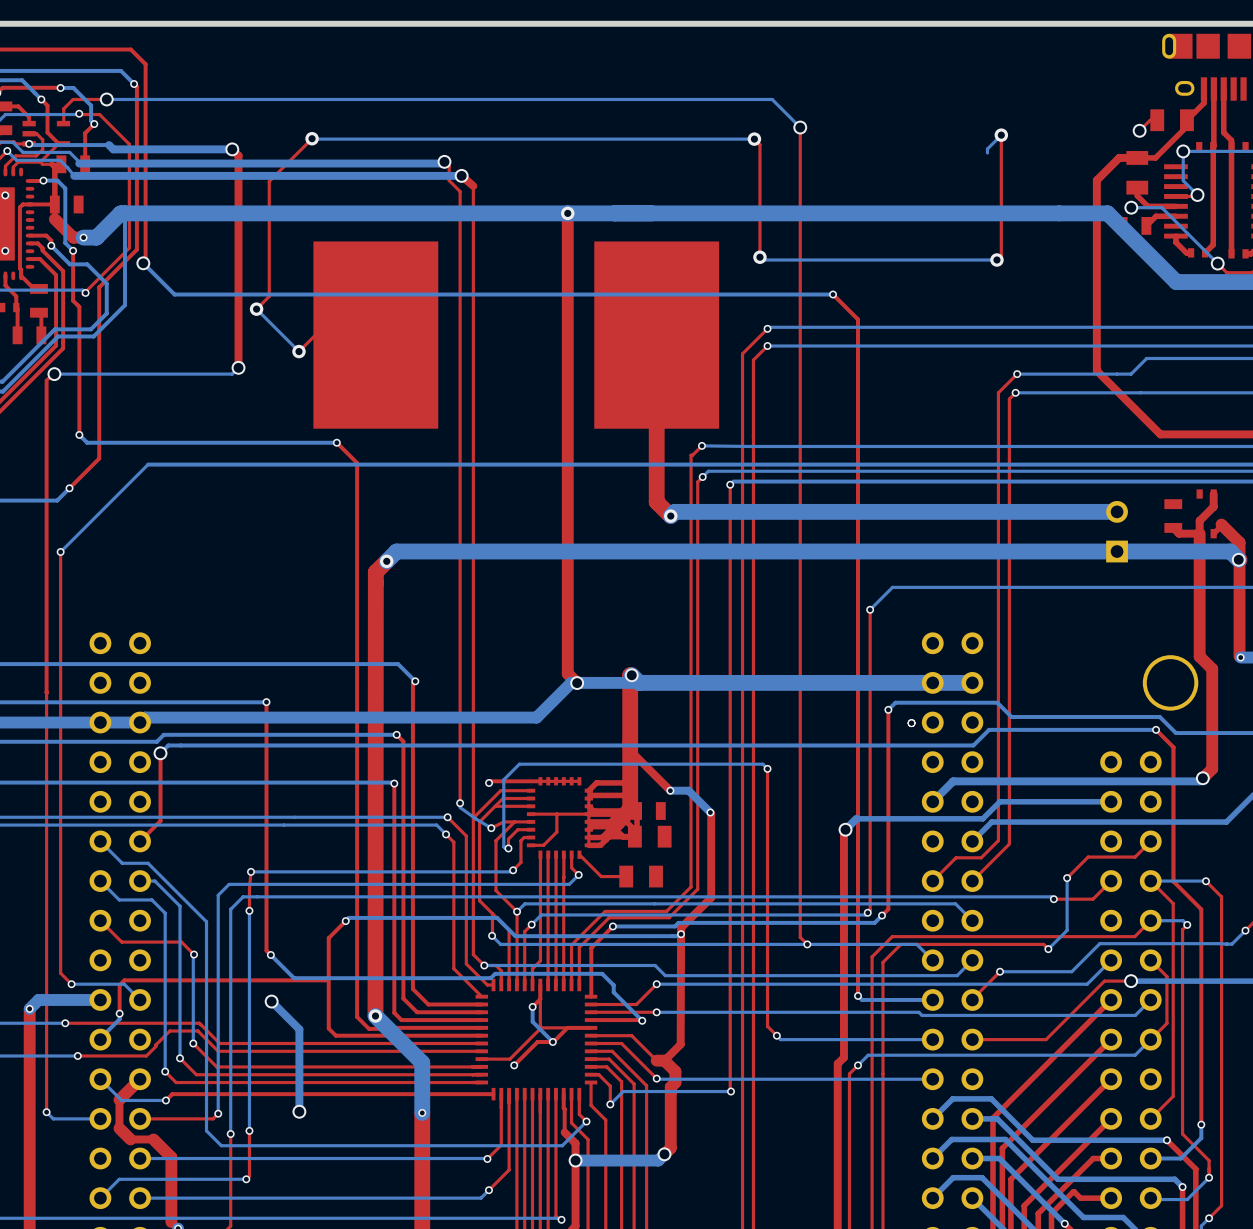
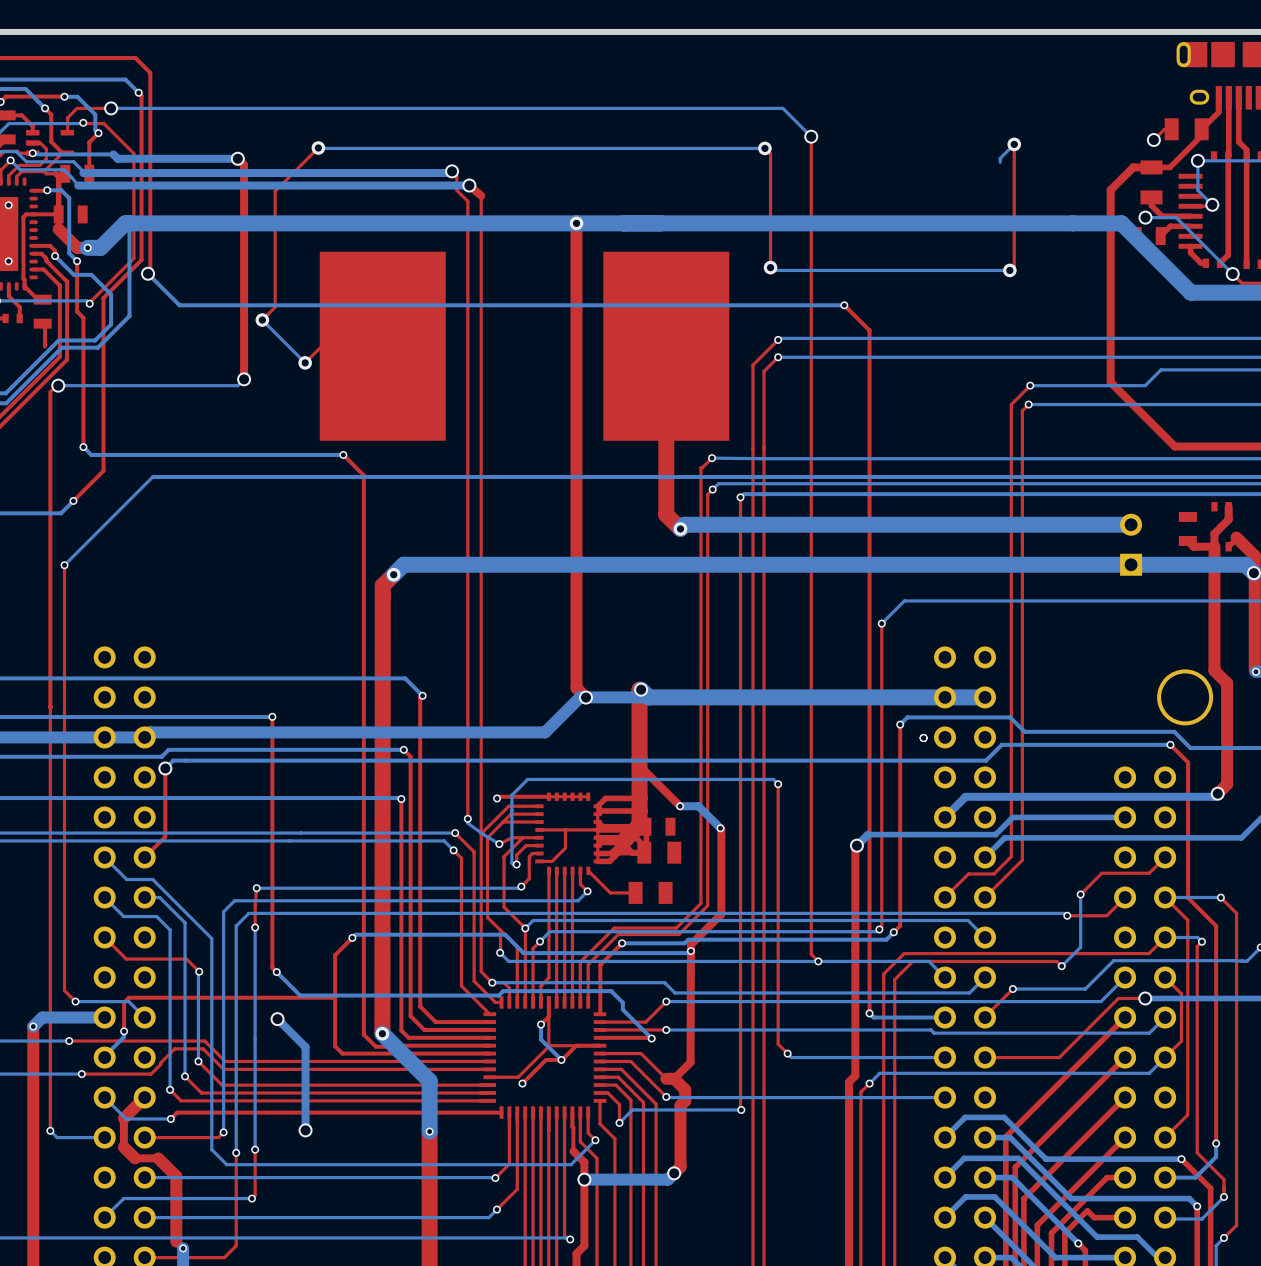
top track: (16, 307) (17, 335) -> none
part: (29, 335) -> none

